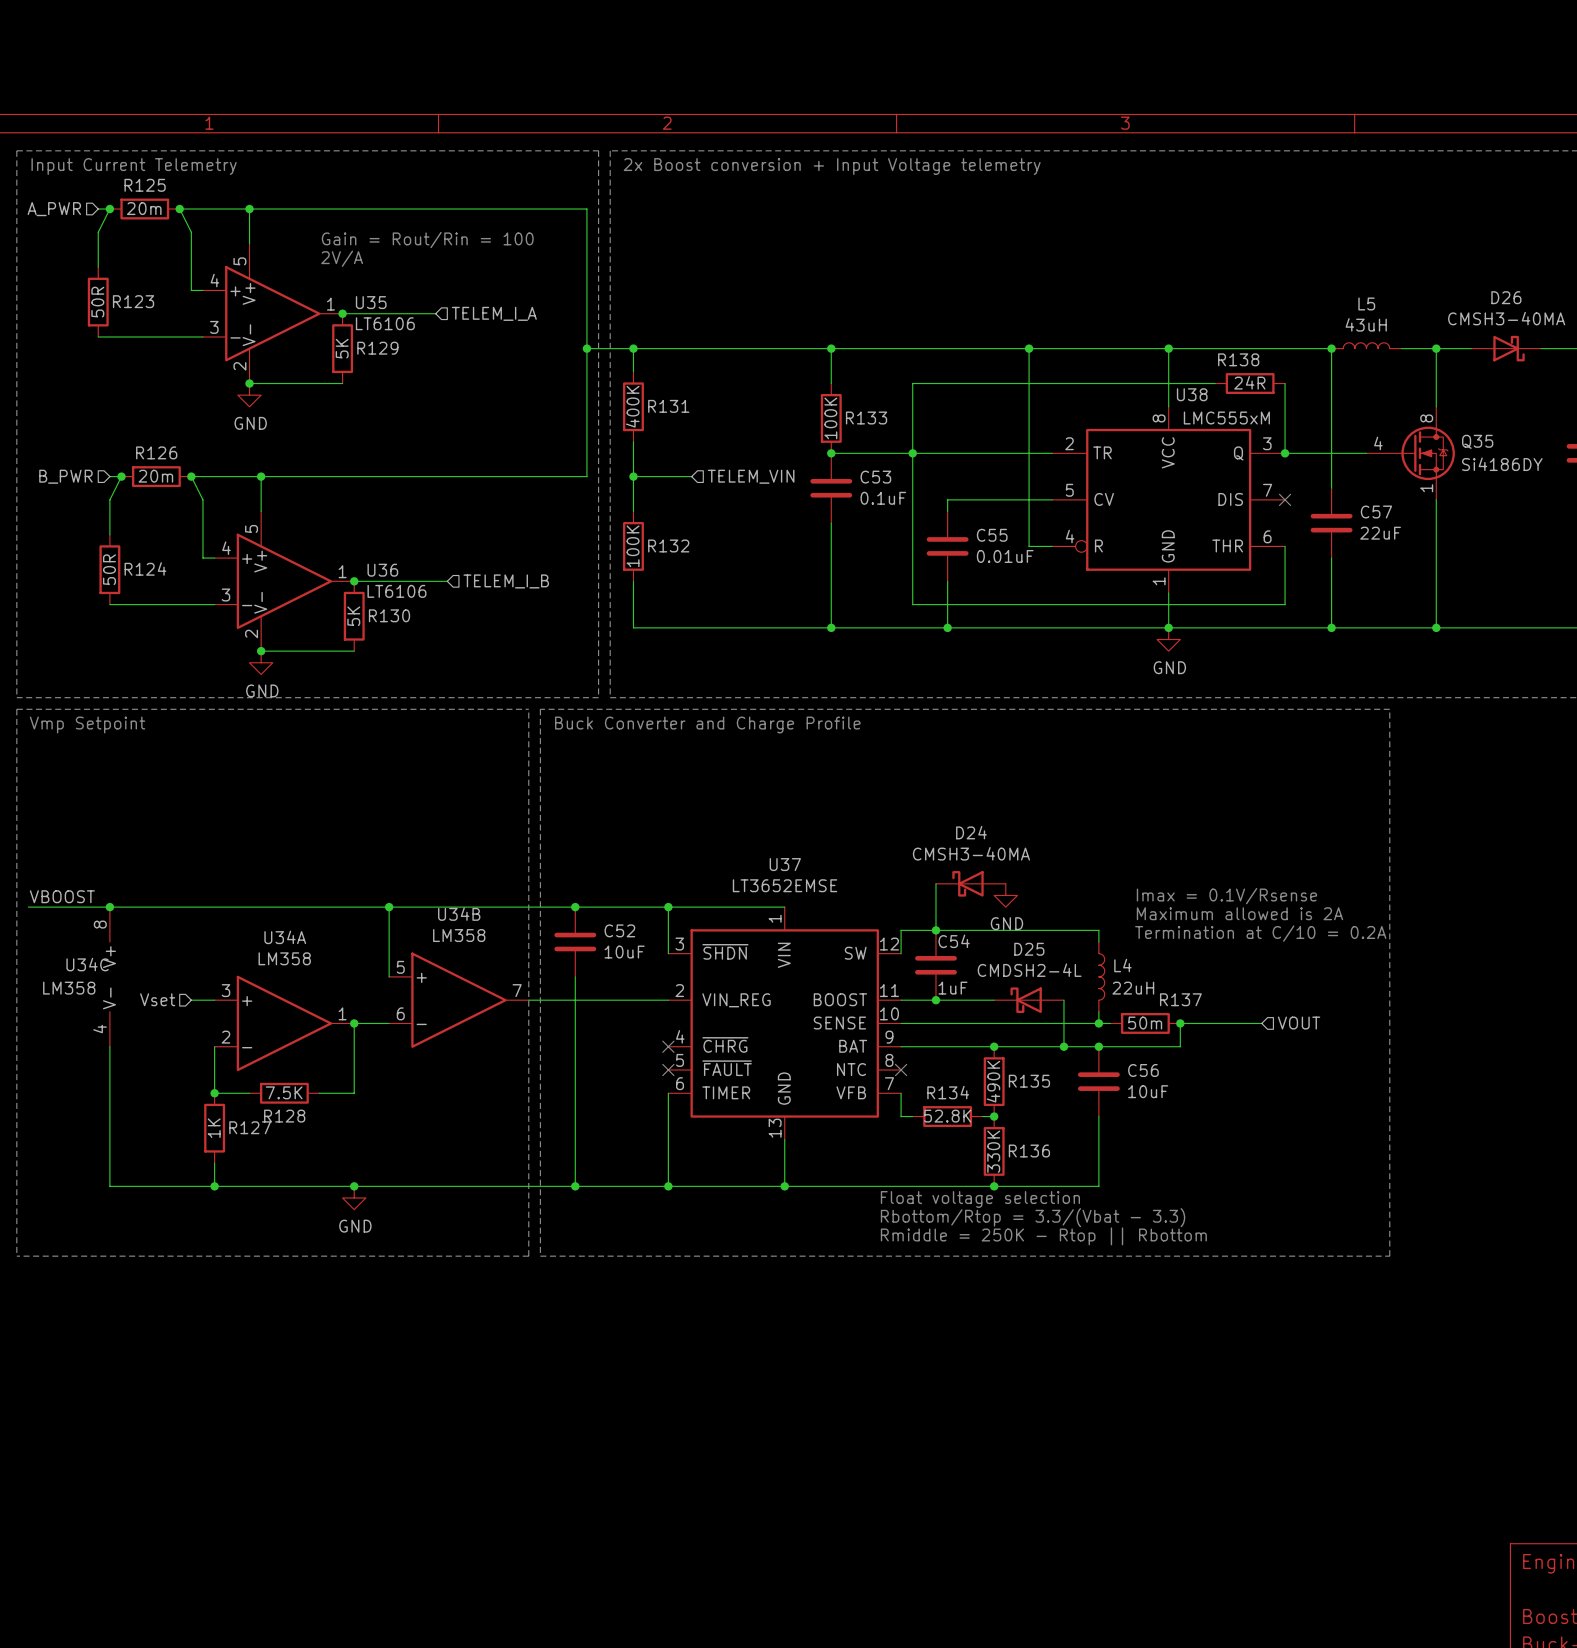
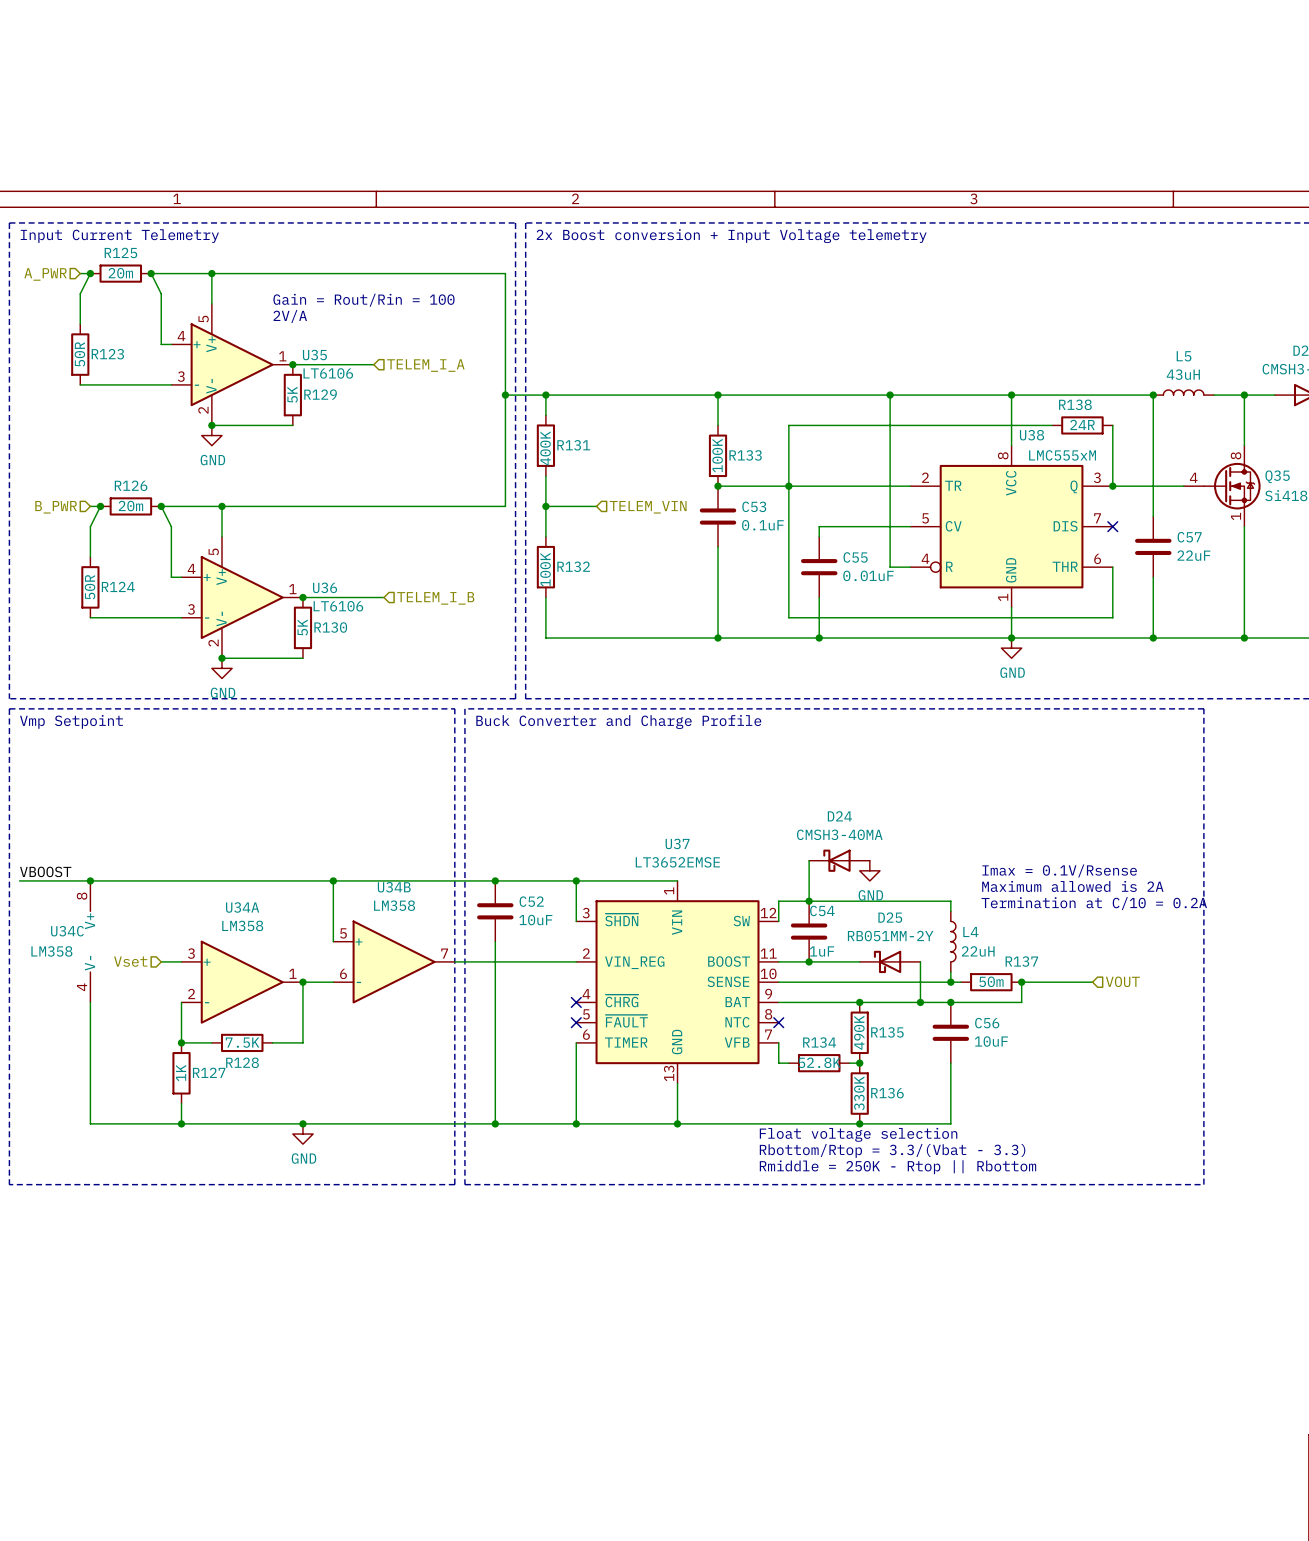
D25 value: CMDSH2-4L (1029, 970) -> RB051MM-2Y (890, 936)

